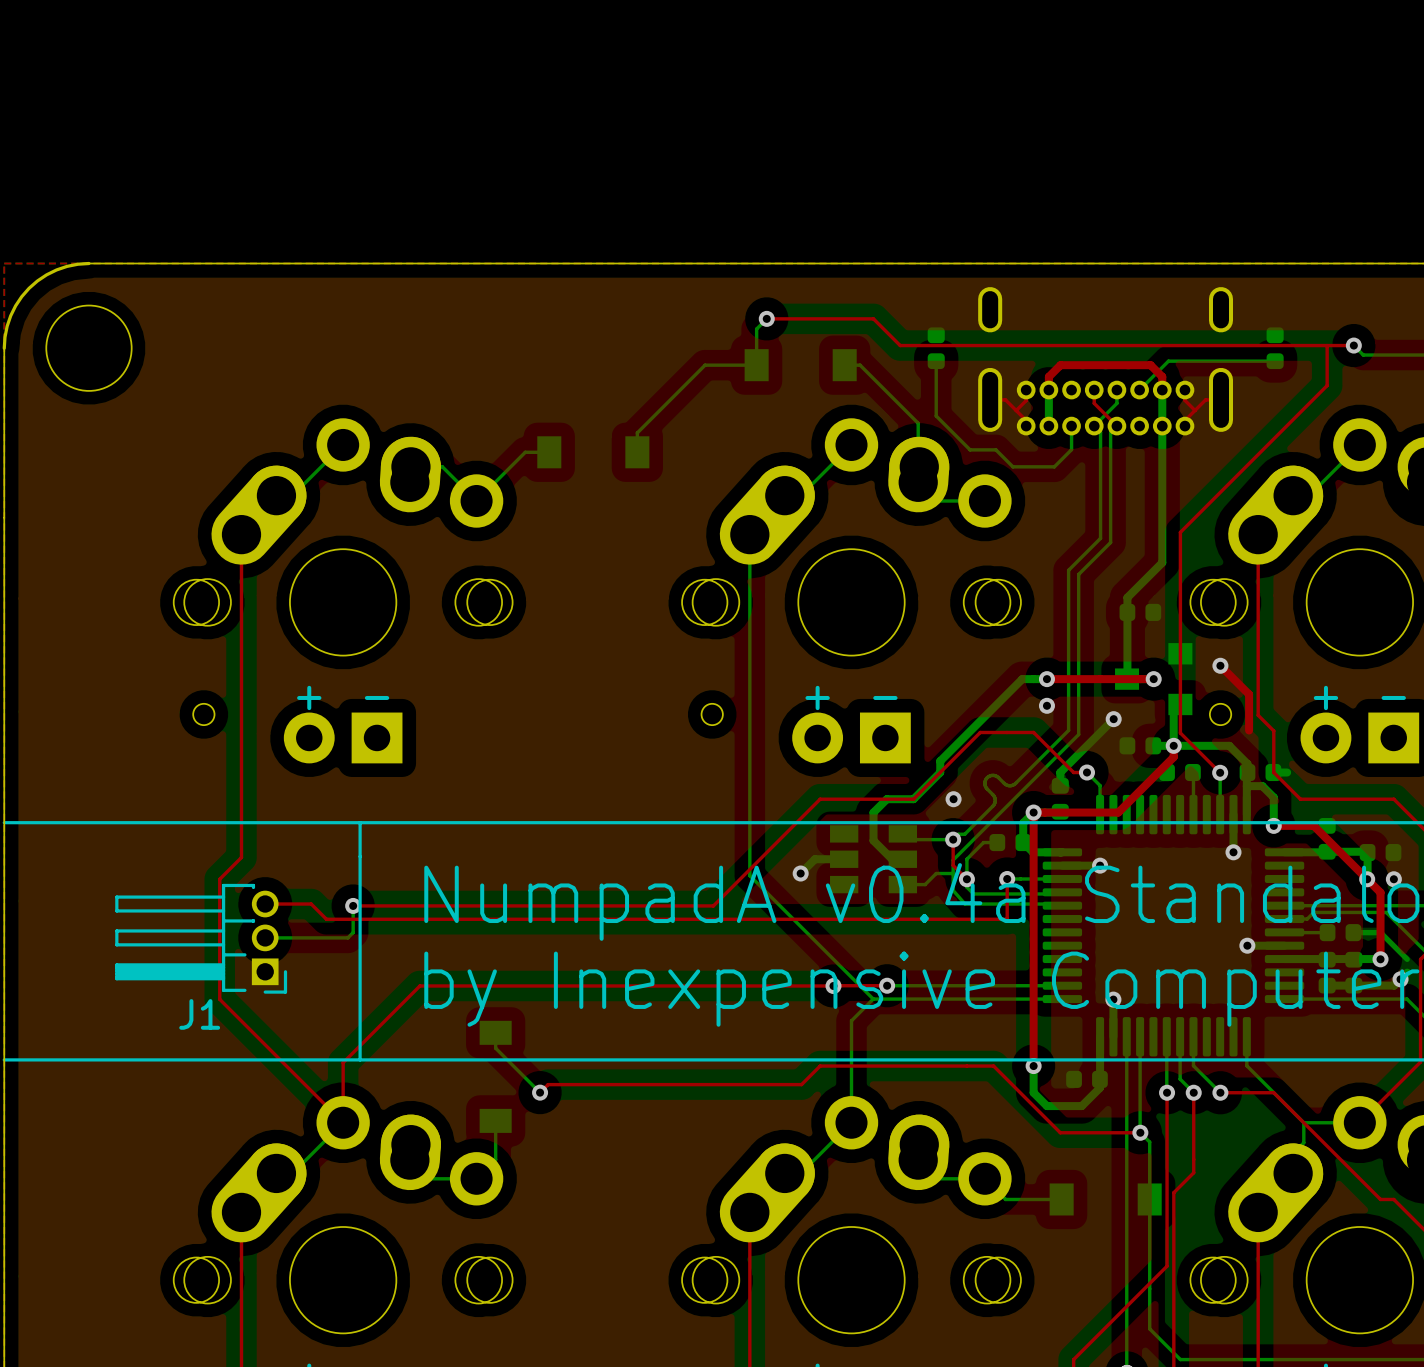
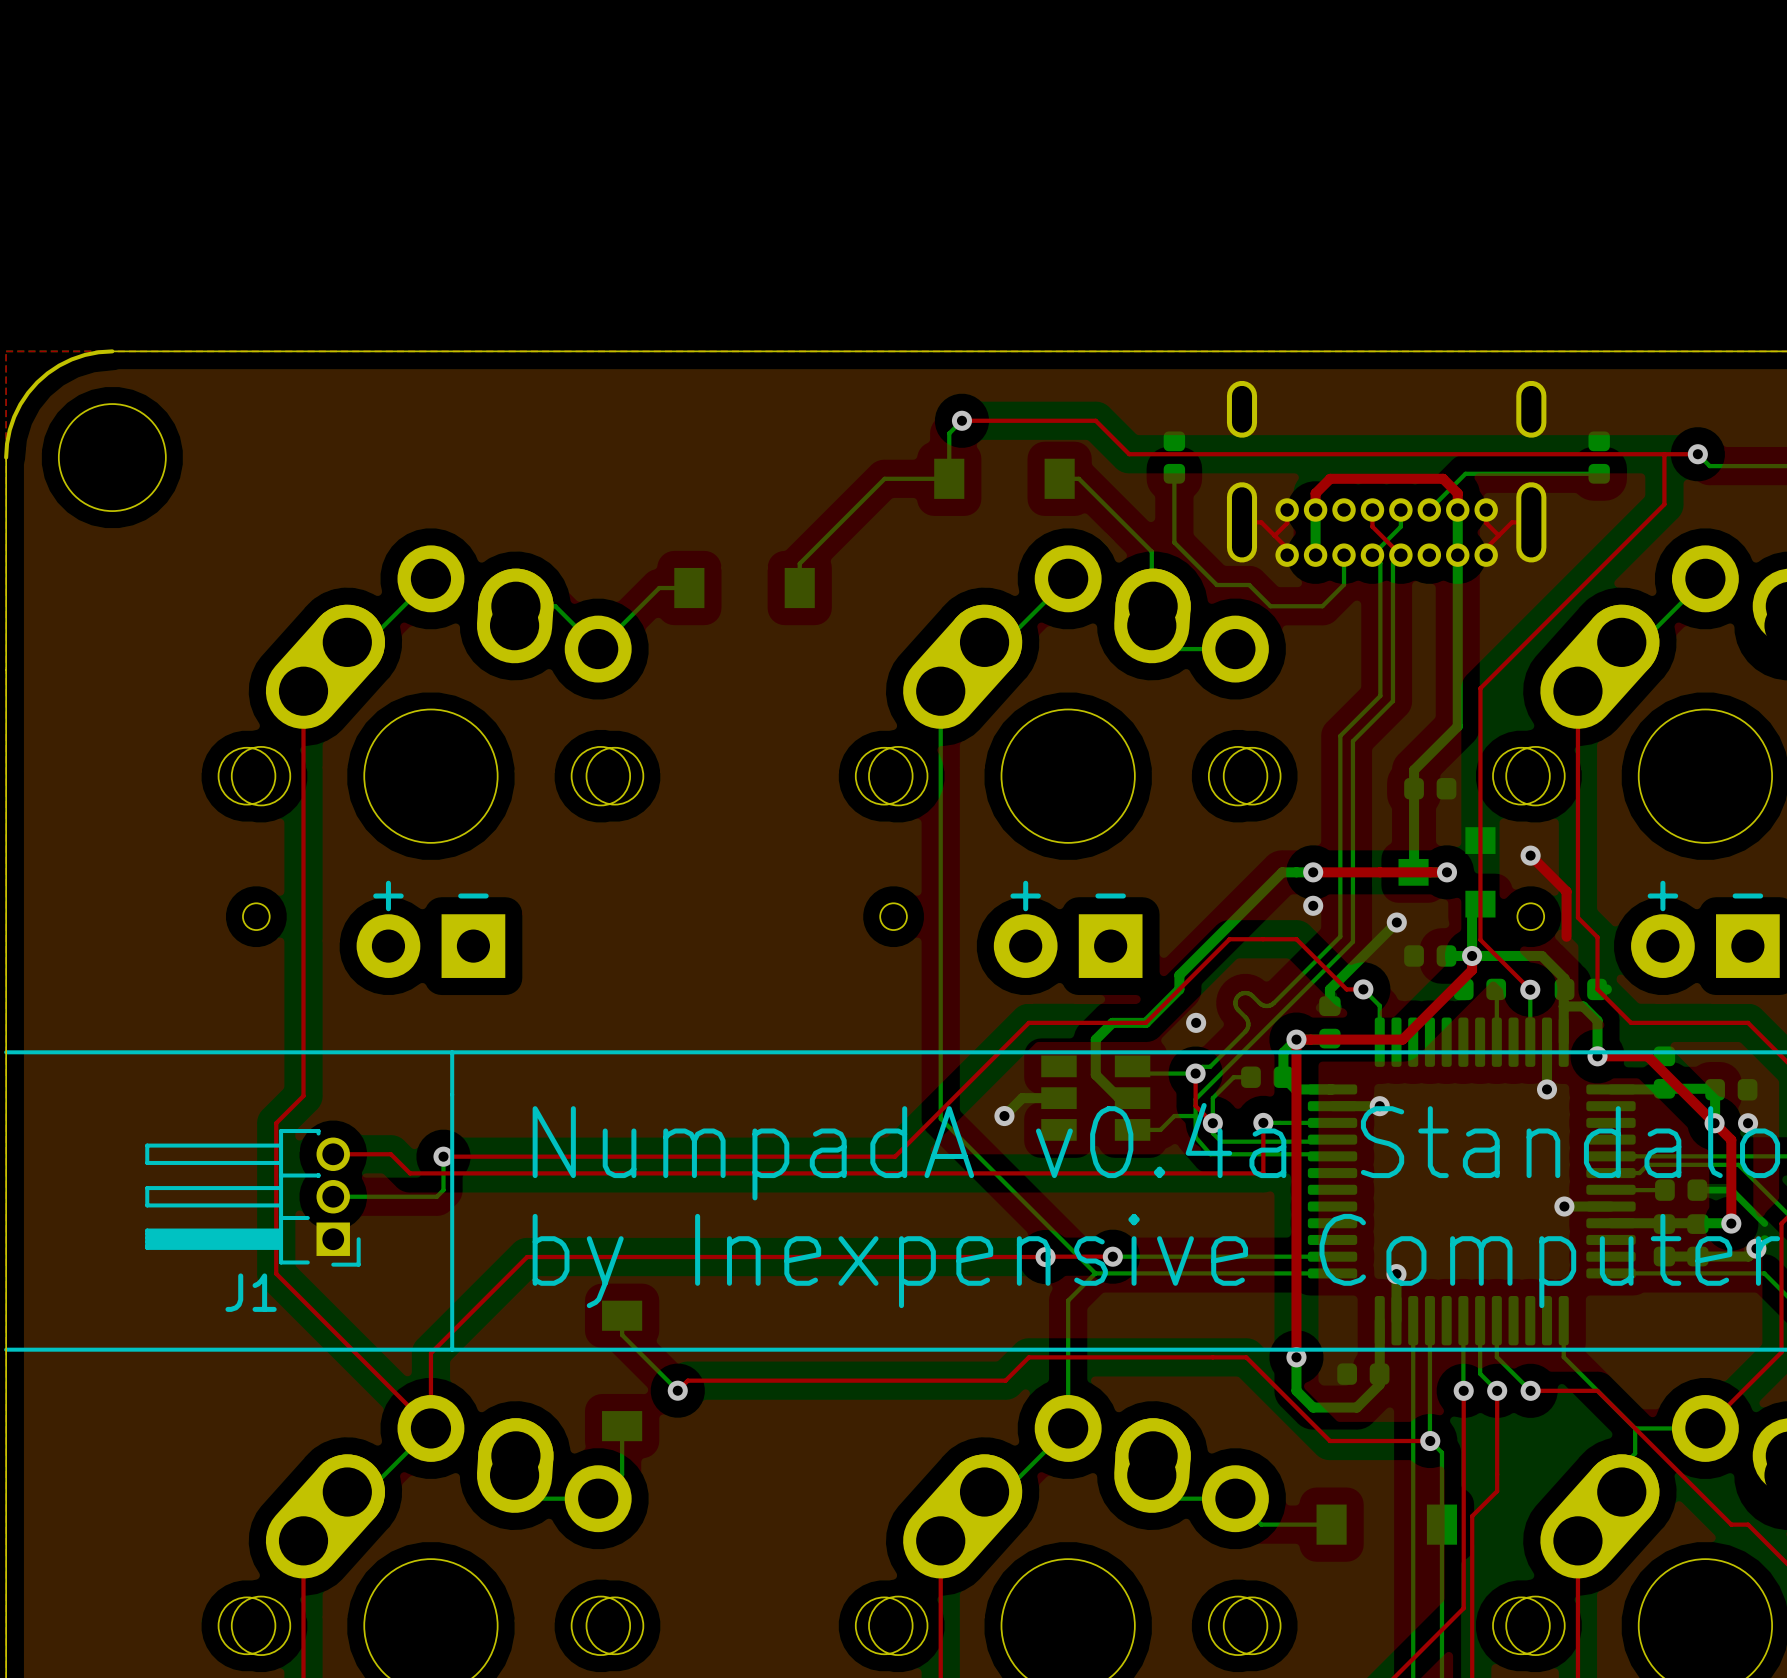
bottom track: (1281, 772) (1287, 772) -> none

